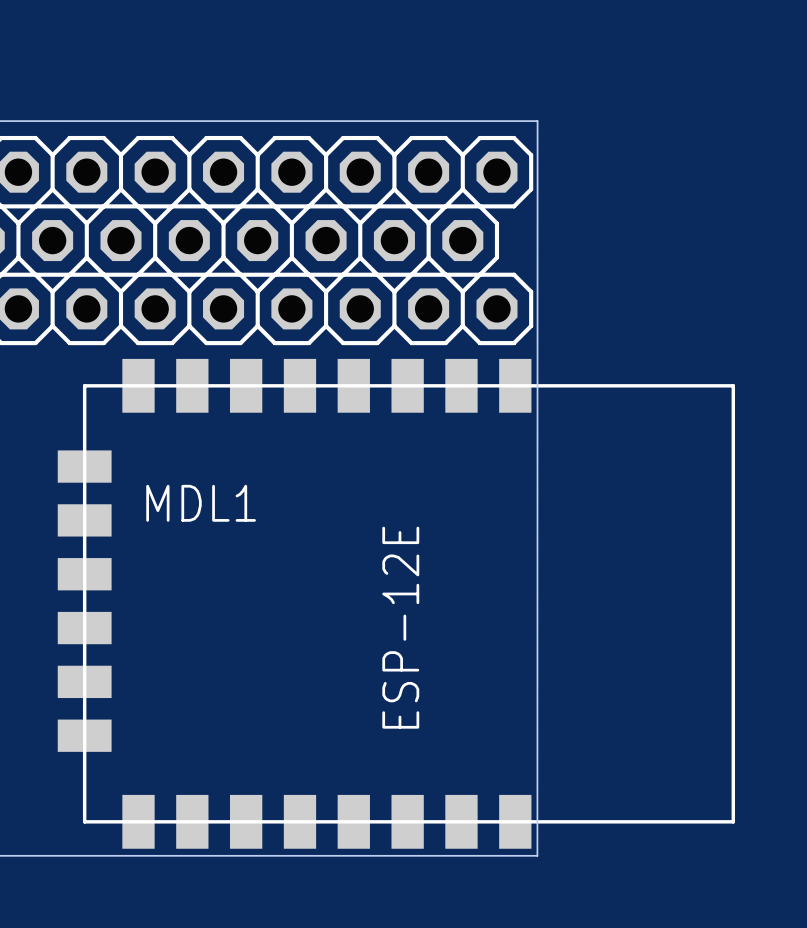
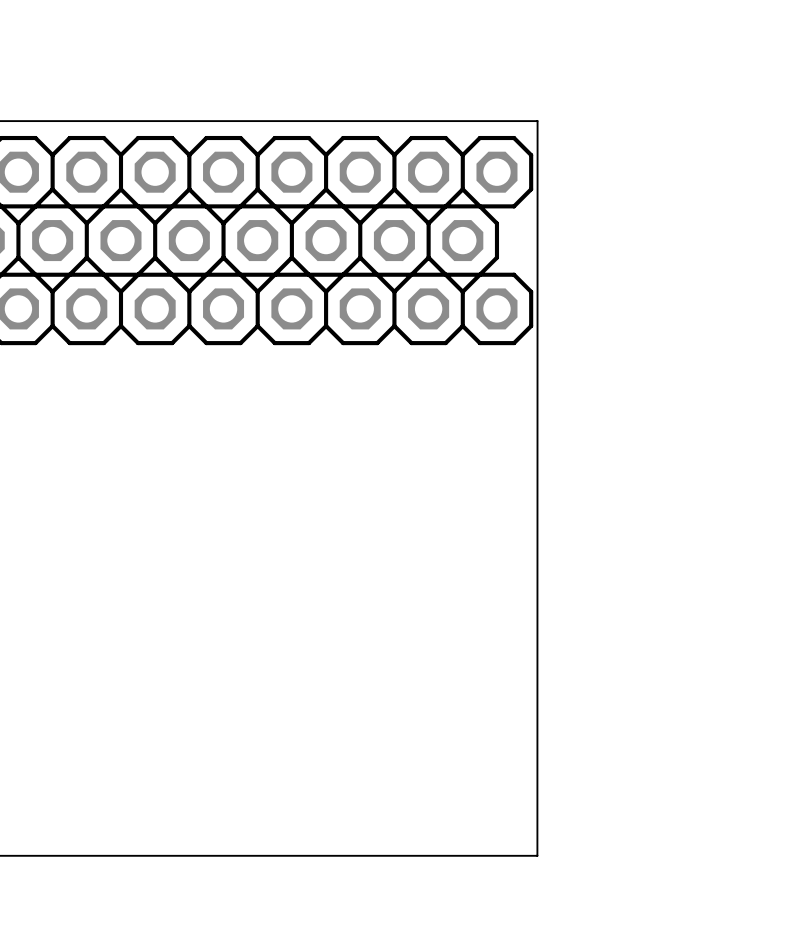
MDL1: (396, 603) -> none

